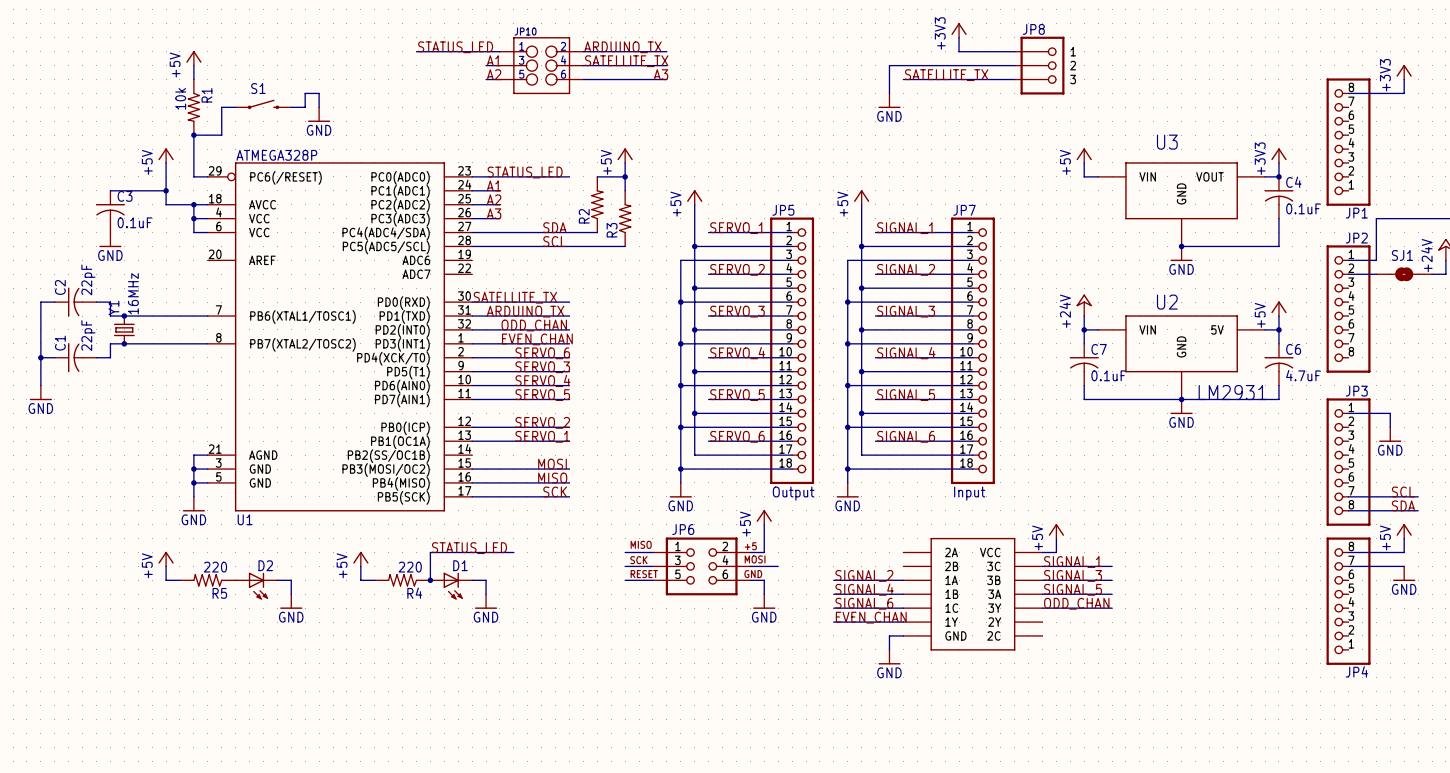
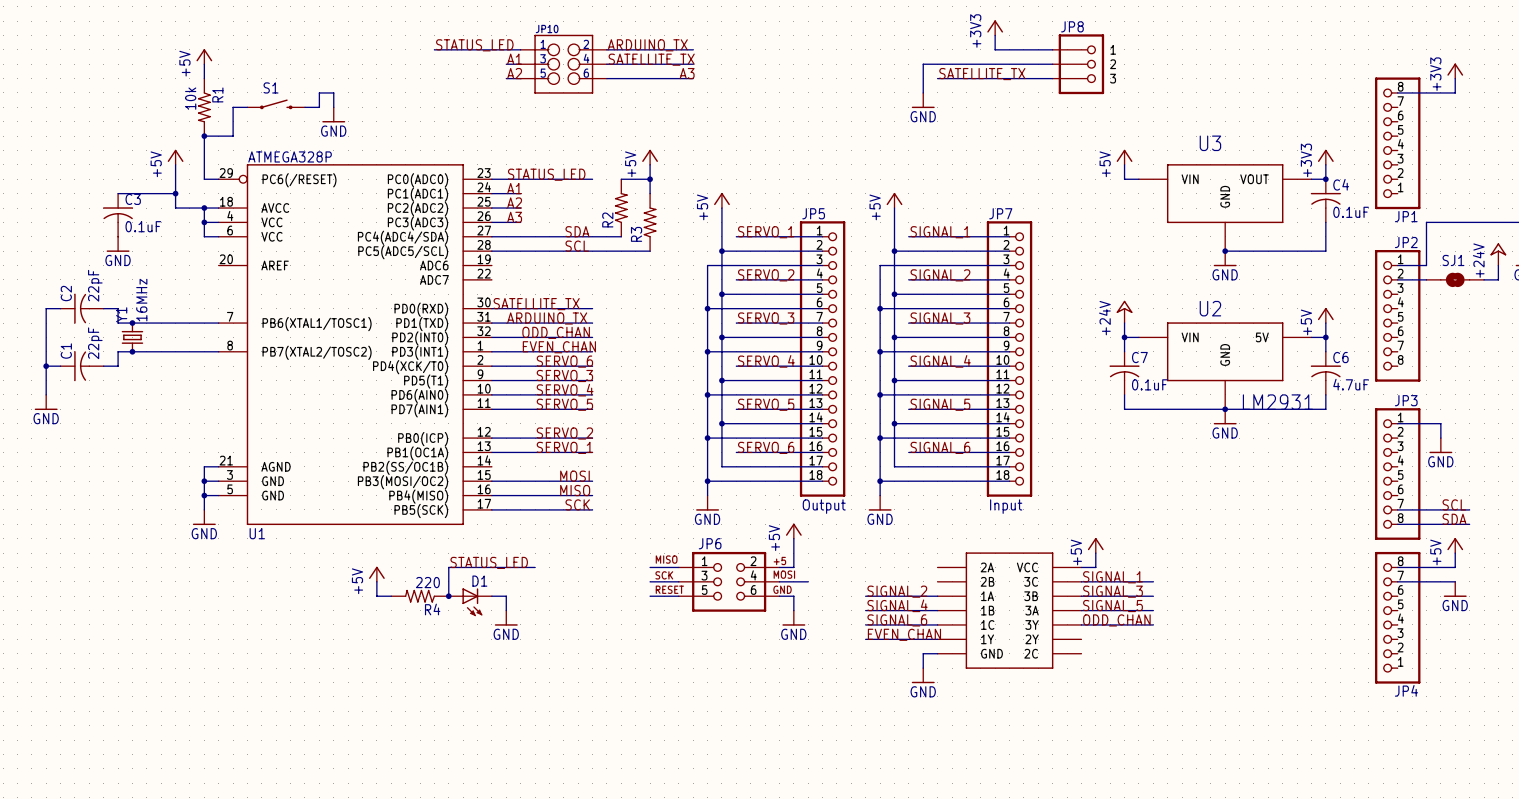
power symbol: +5V (166, 559) -> none
wire: (166, 566) (166, 580) (179, 580) -> none
R5: 220 (207, 580) -> none
wire: (277, 580) (291, 580) (291, 594) -> none
D2: (256, 586) -> none
power symbol: GND (291, 601) -> none

